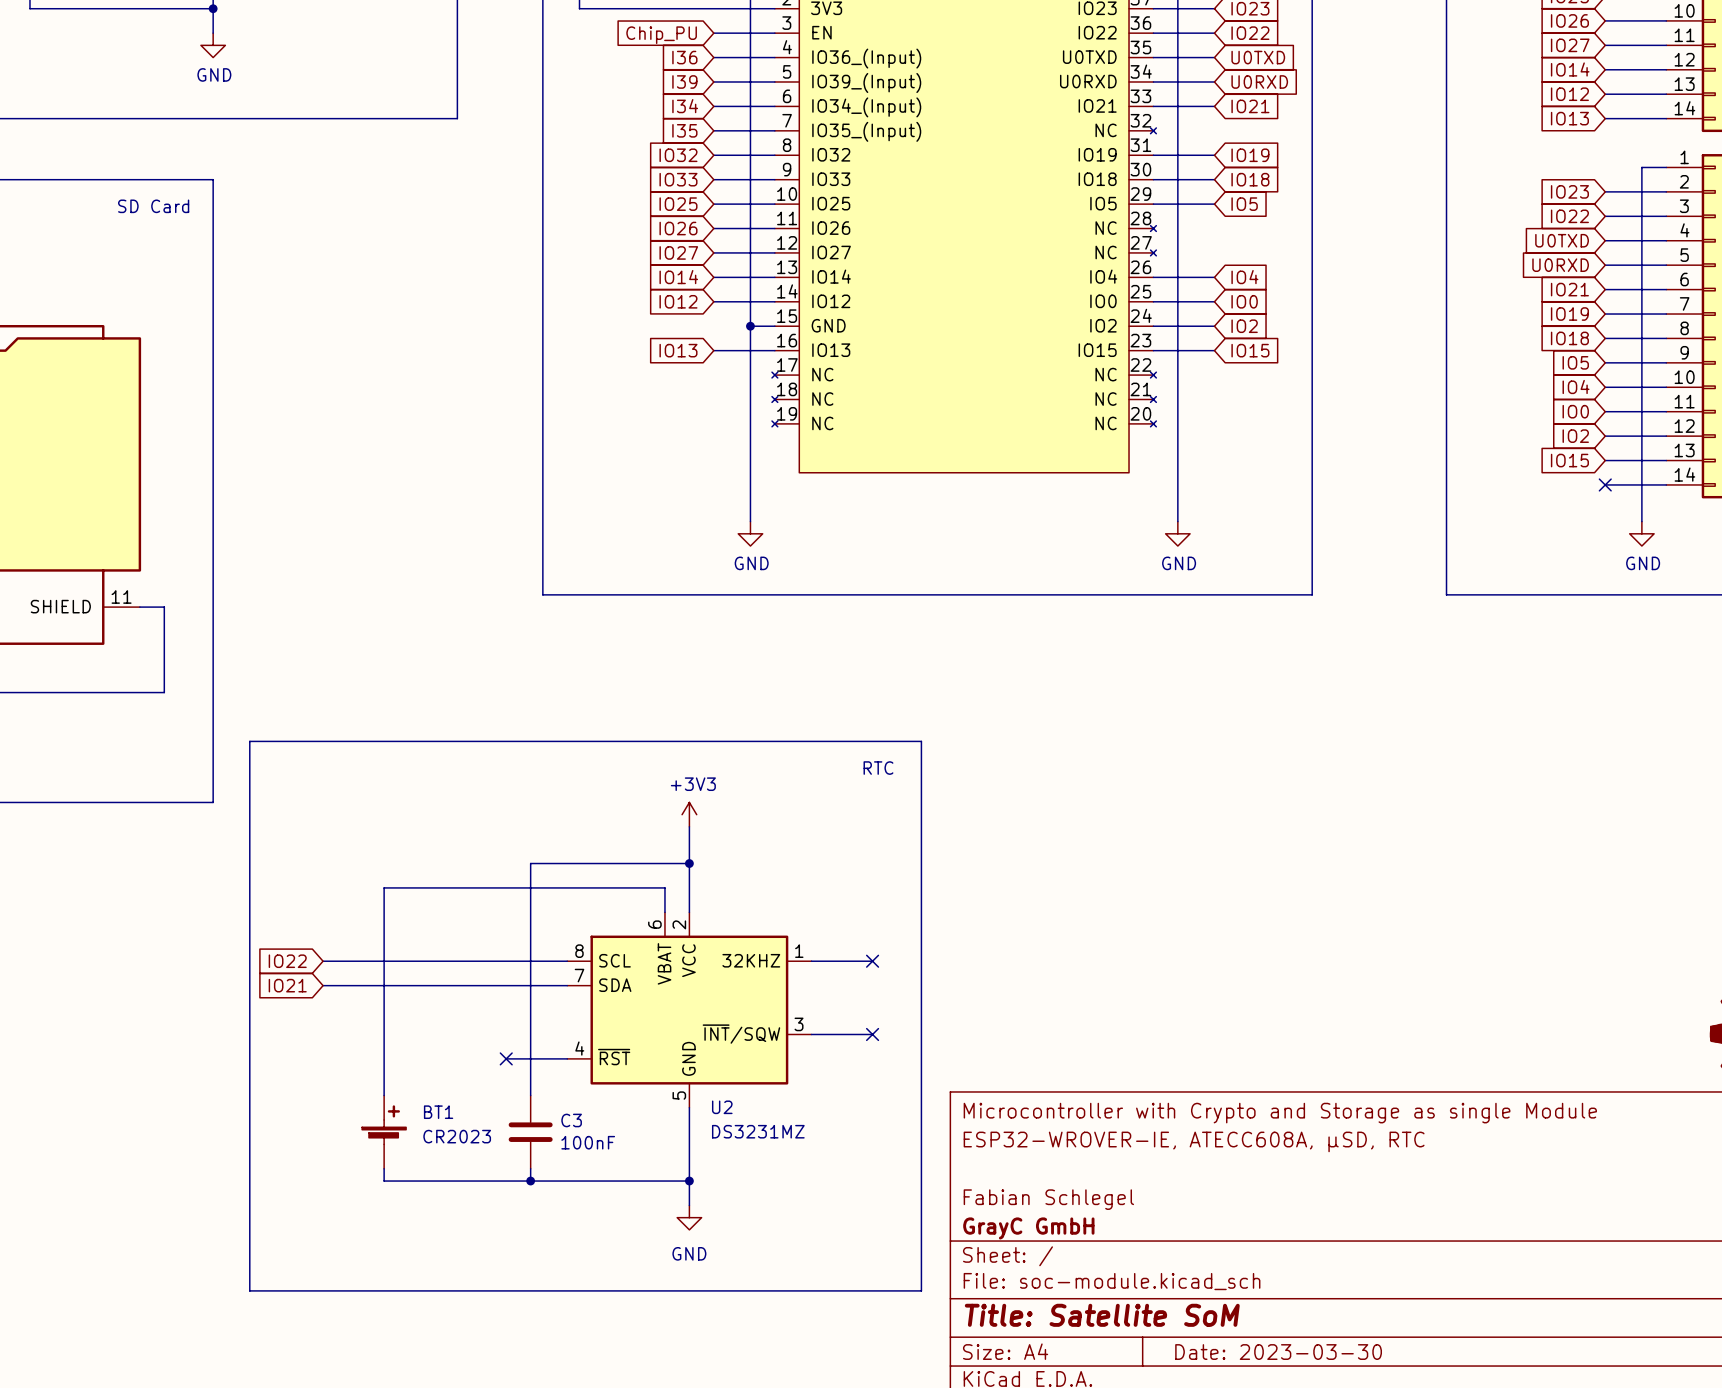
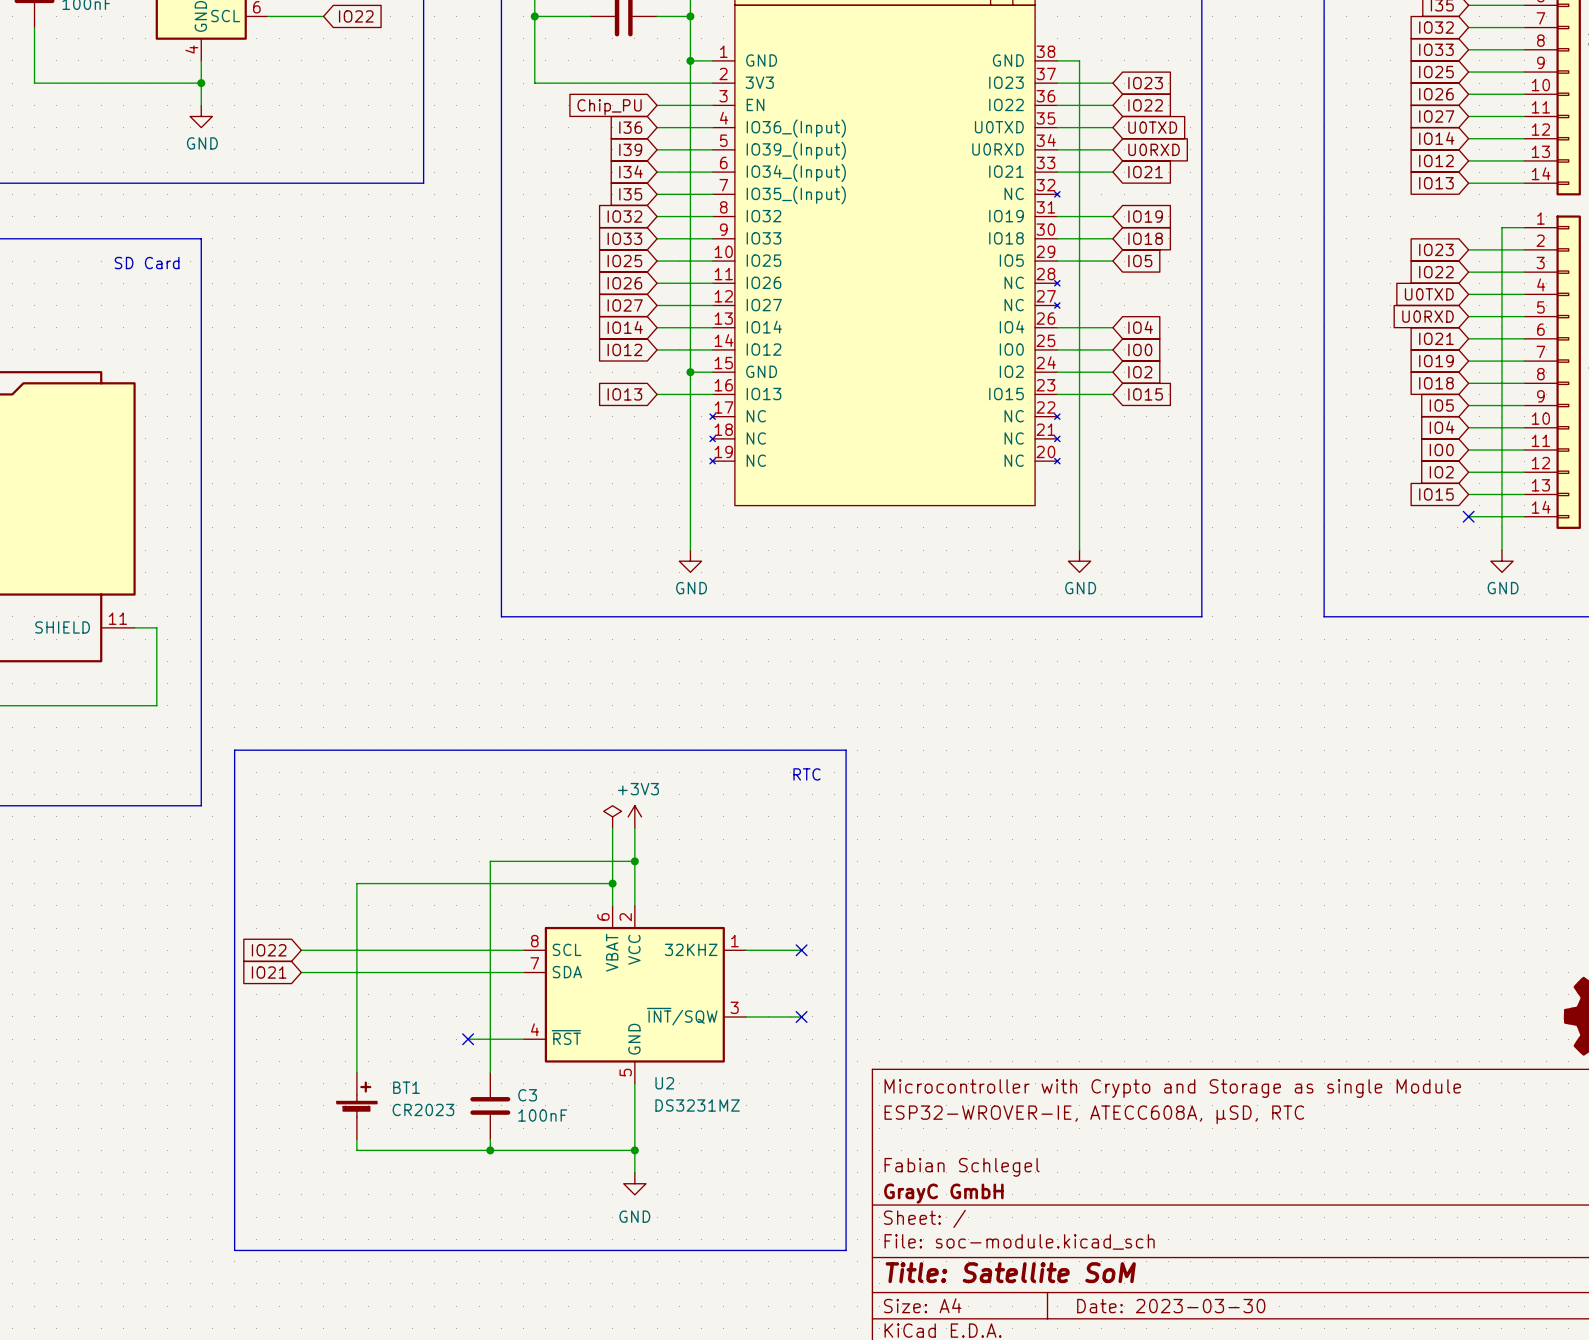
power symbol: none -> (612, 816)
wire: none -> (612, 828) (612, 883)
junction: none -> (612, 883)

